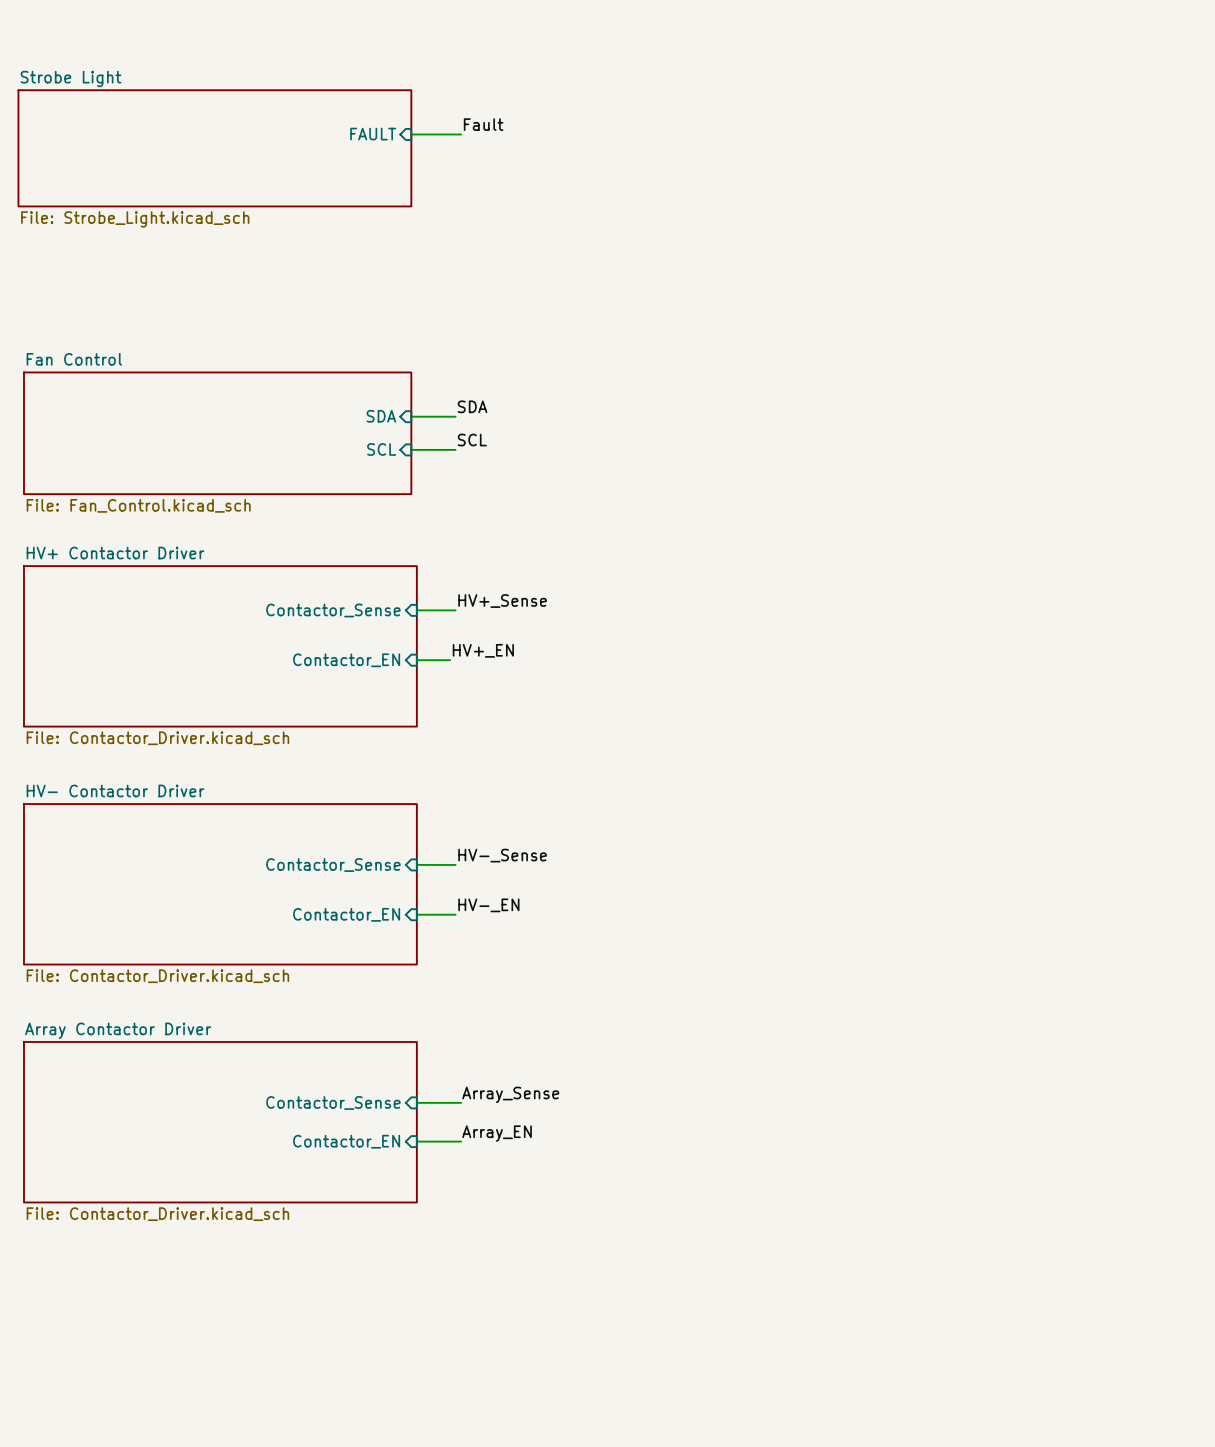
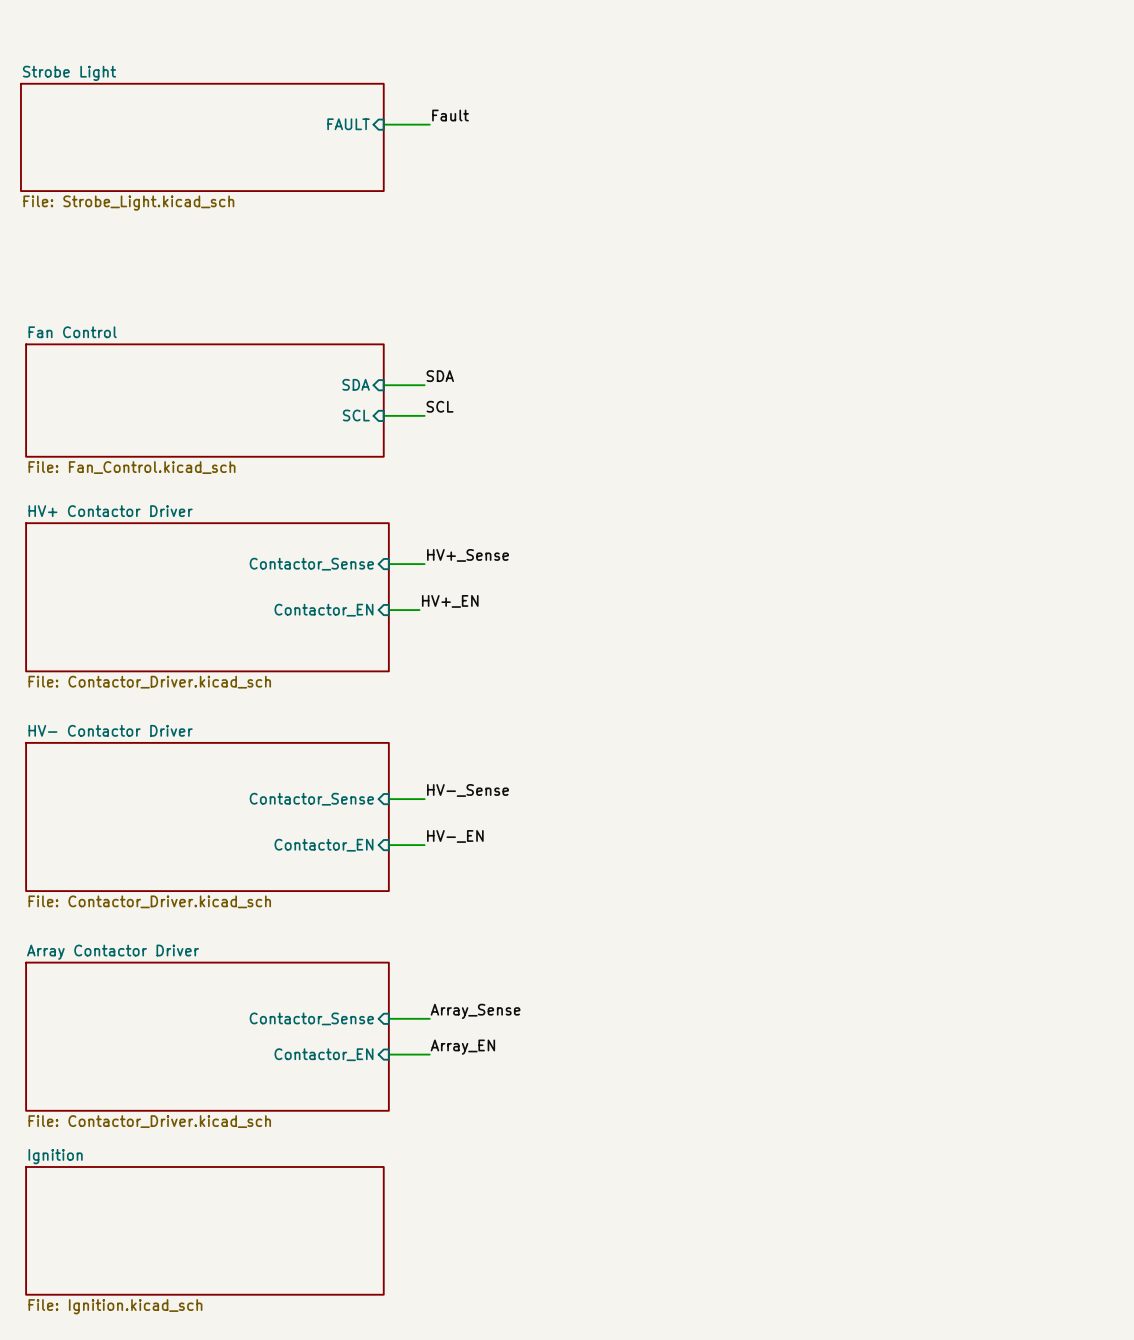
sheet Ignition: none -> File: Ignition.kicad_sch (204, 1230)

